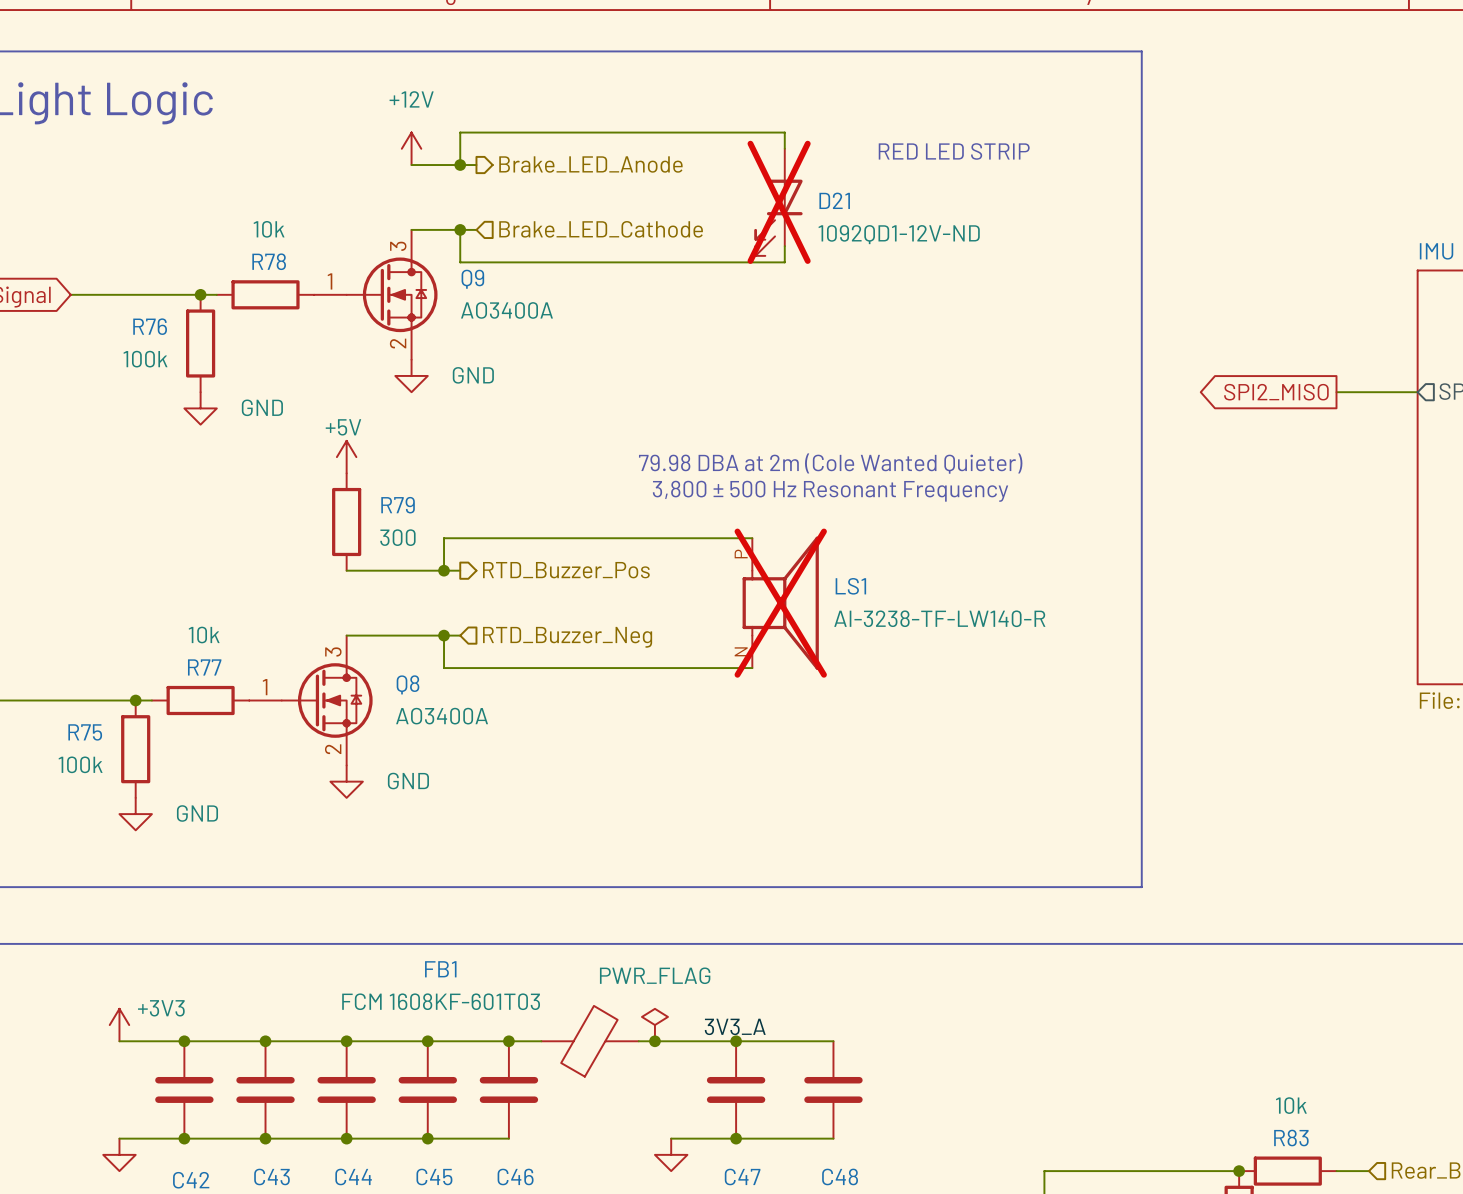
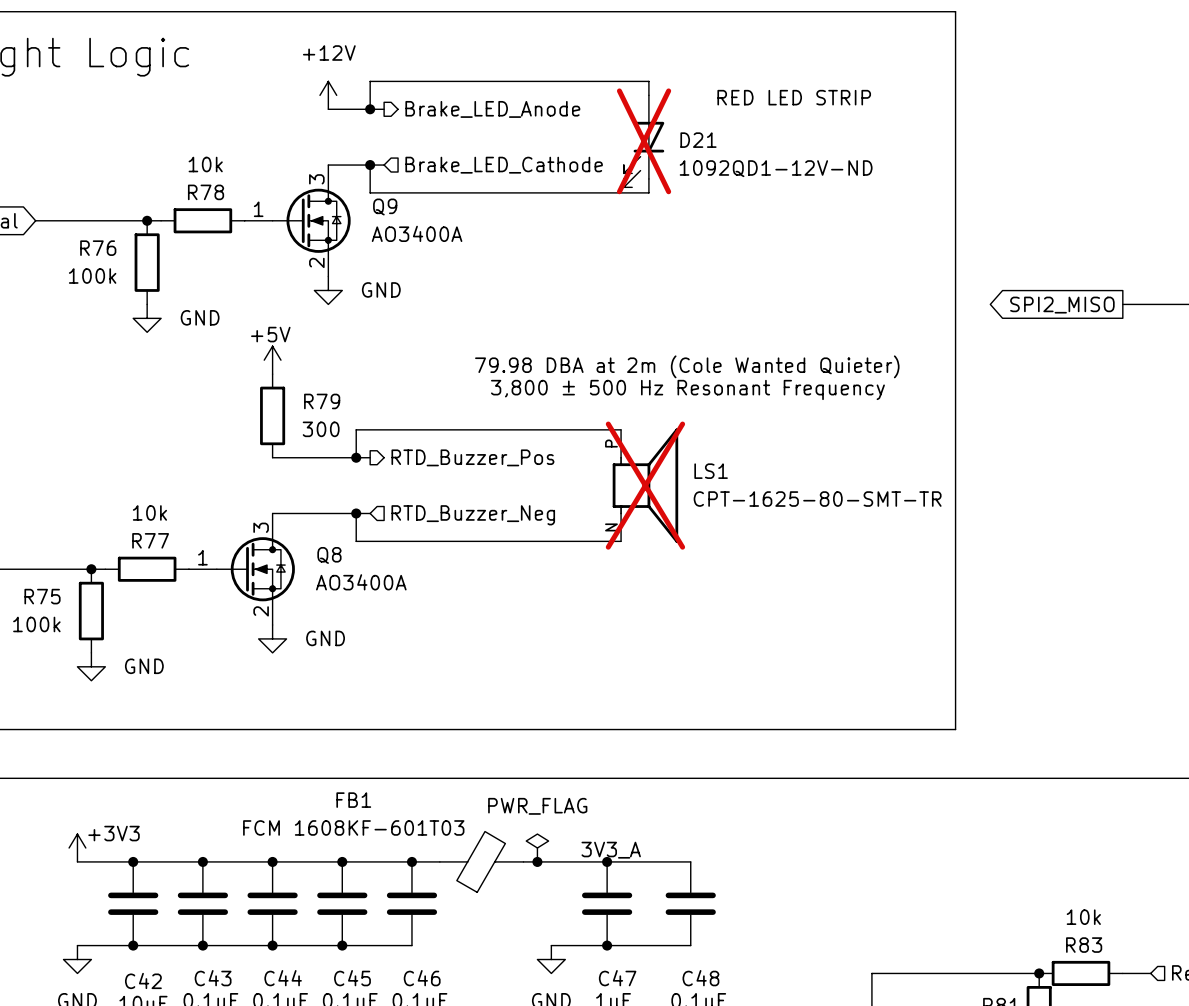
LS1 value: AI-3238-TF-LW140-R (939, 618) -> CPT-1625-80-SMT-TR (817, 499)

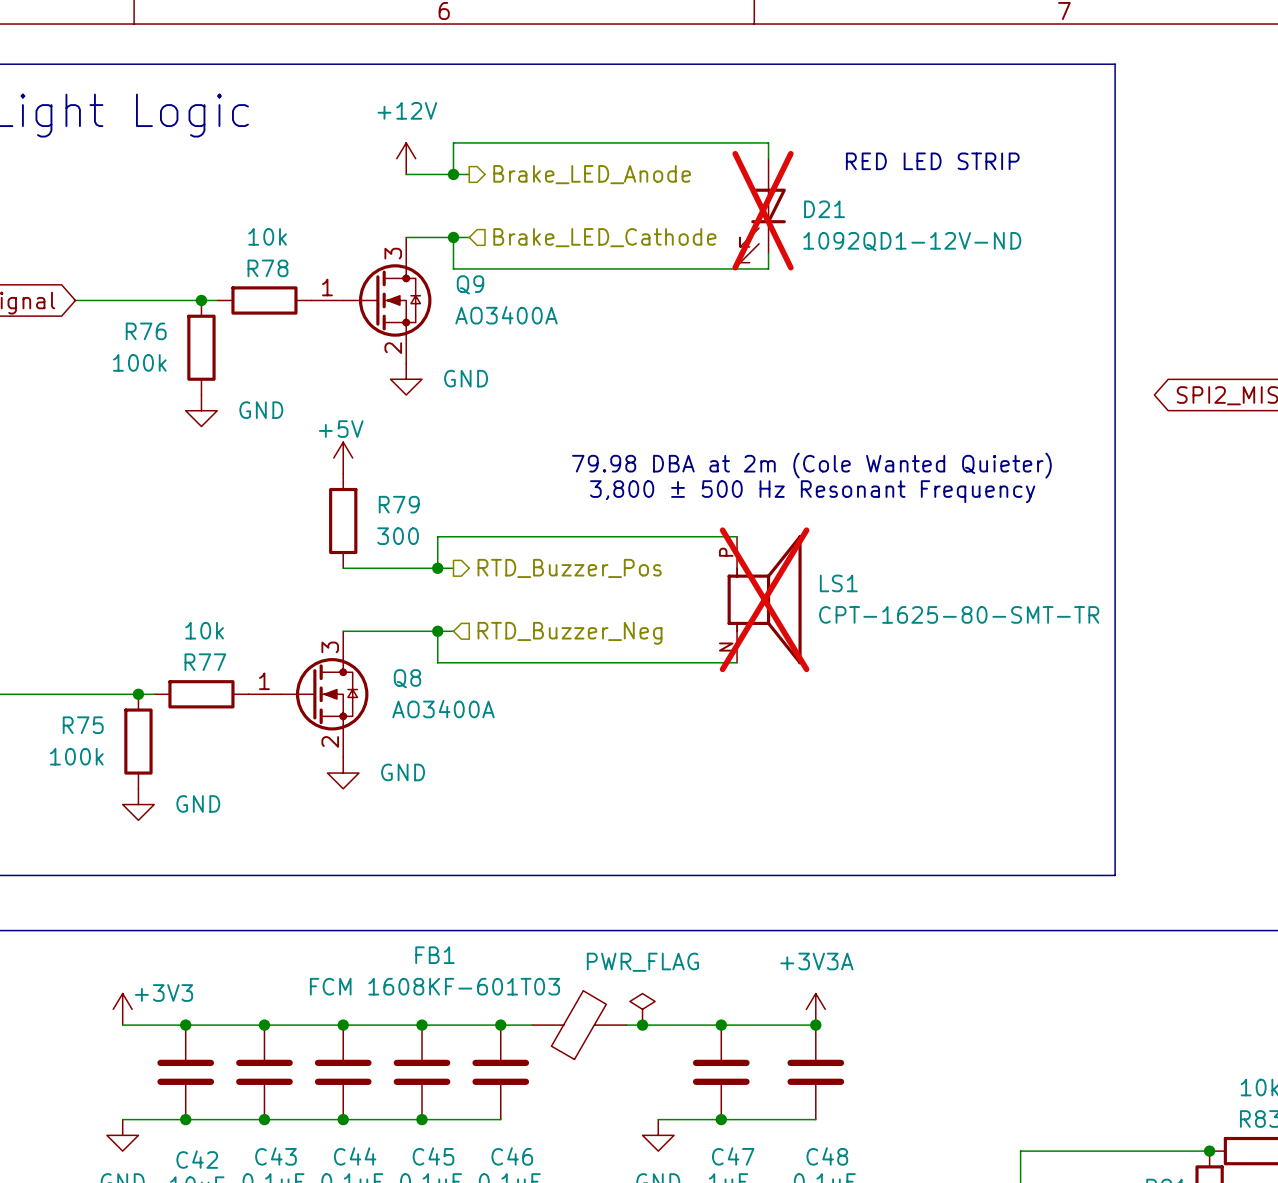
power symbol: none -> +3V3A (815, 1009)
label: 3V3_A (611, 850) -> none
junction: none -> (815, 1025)

